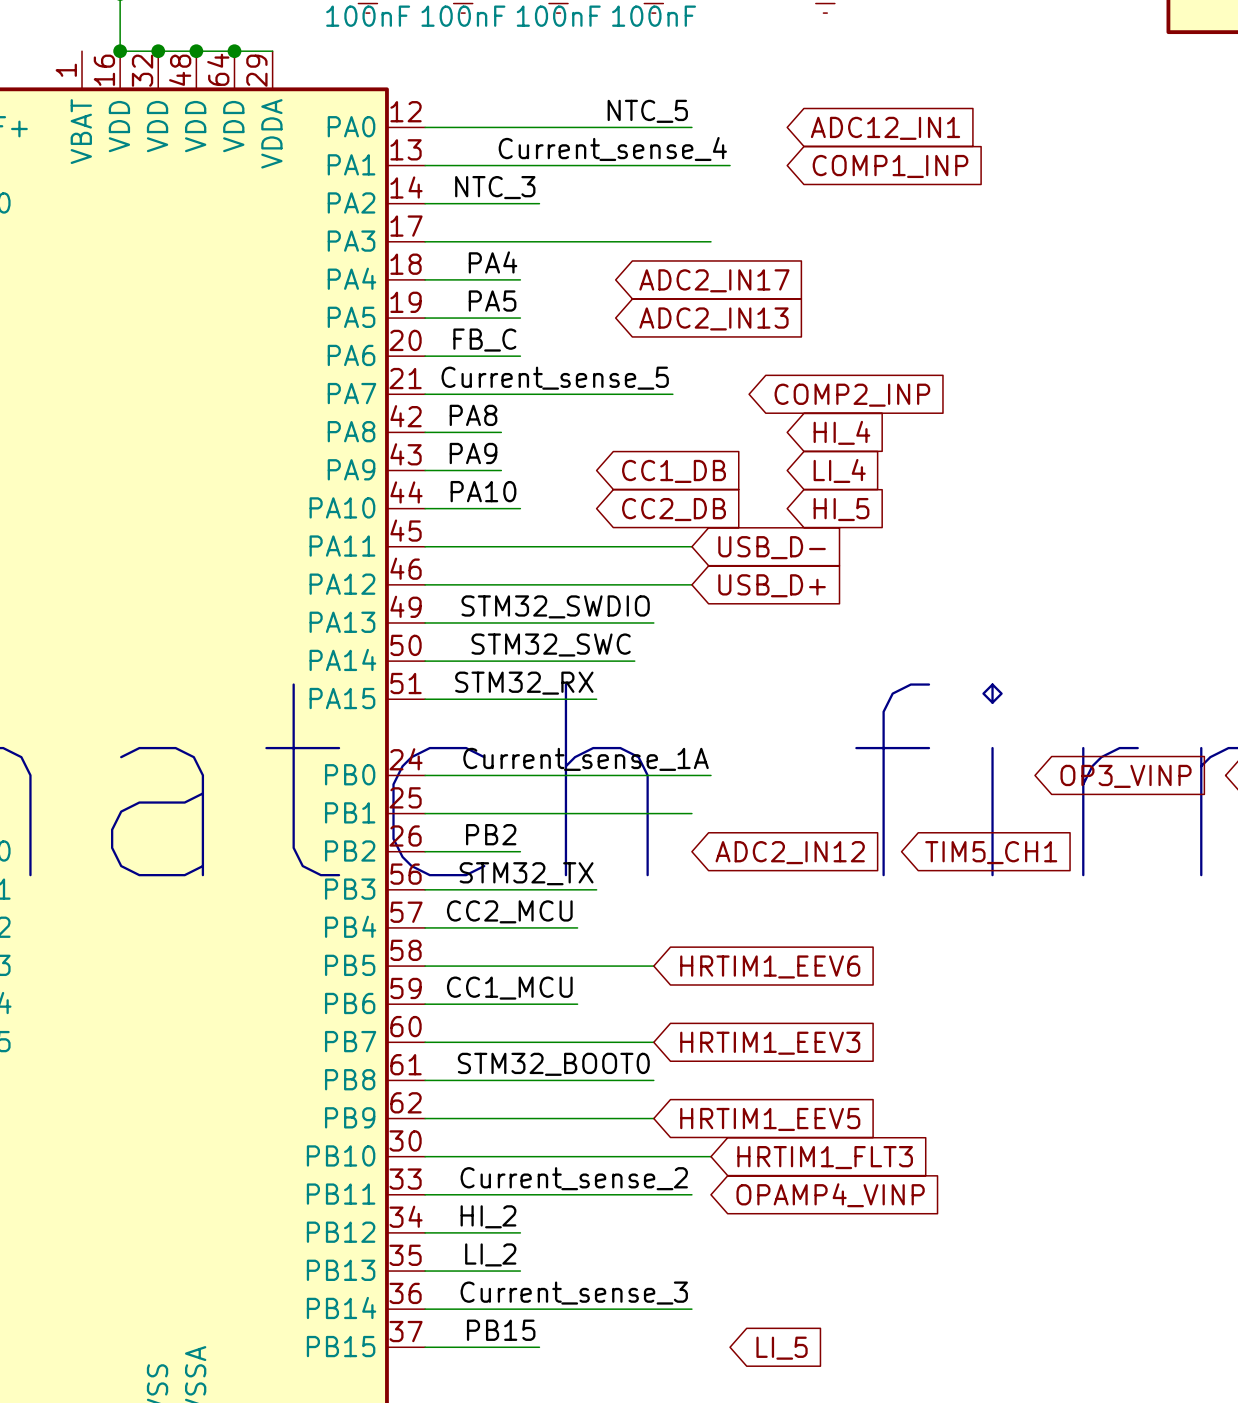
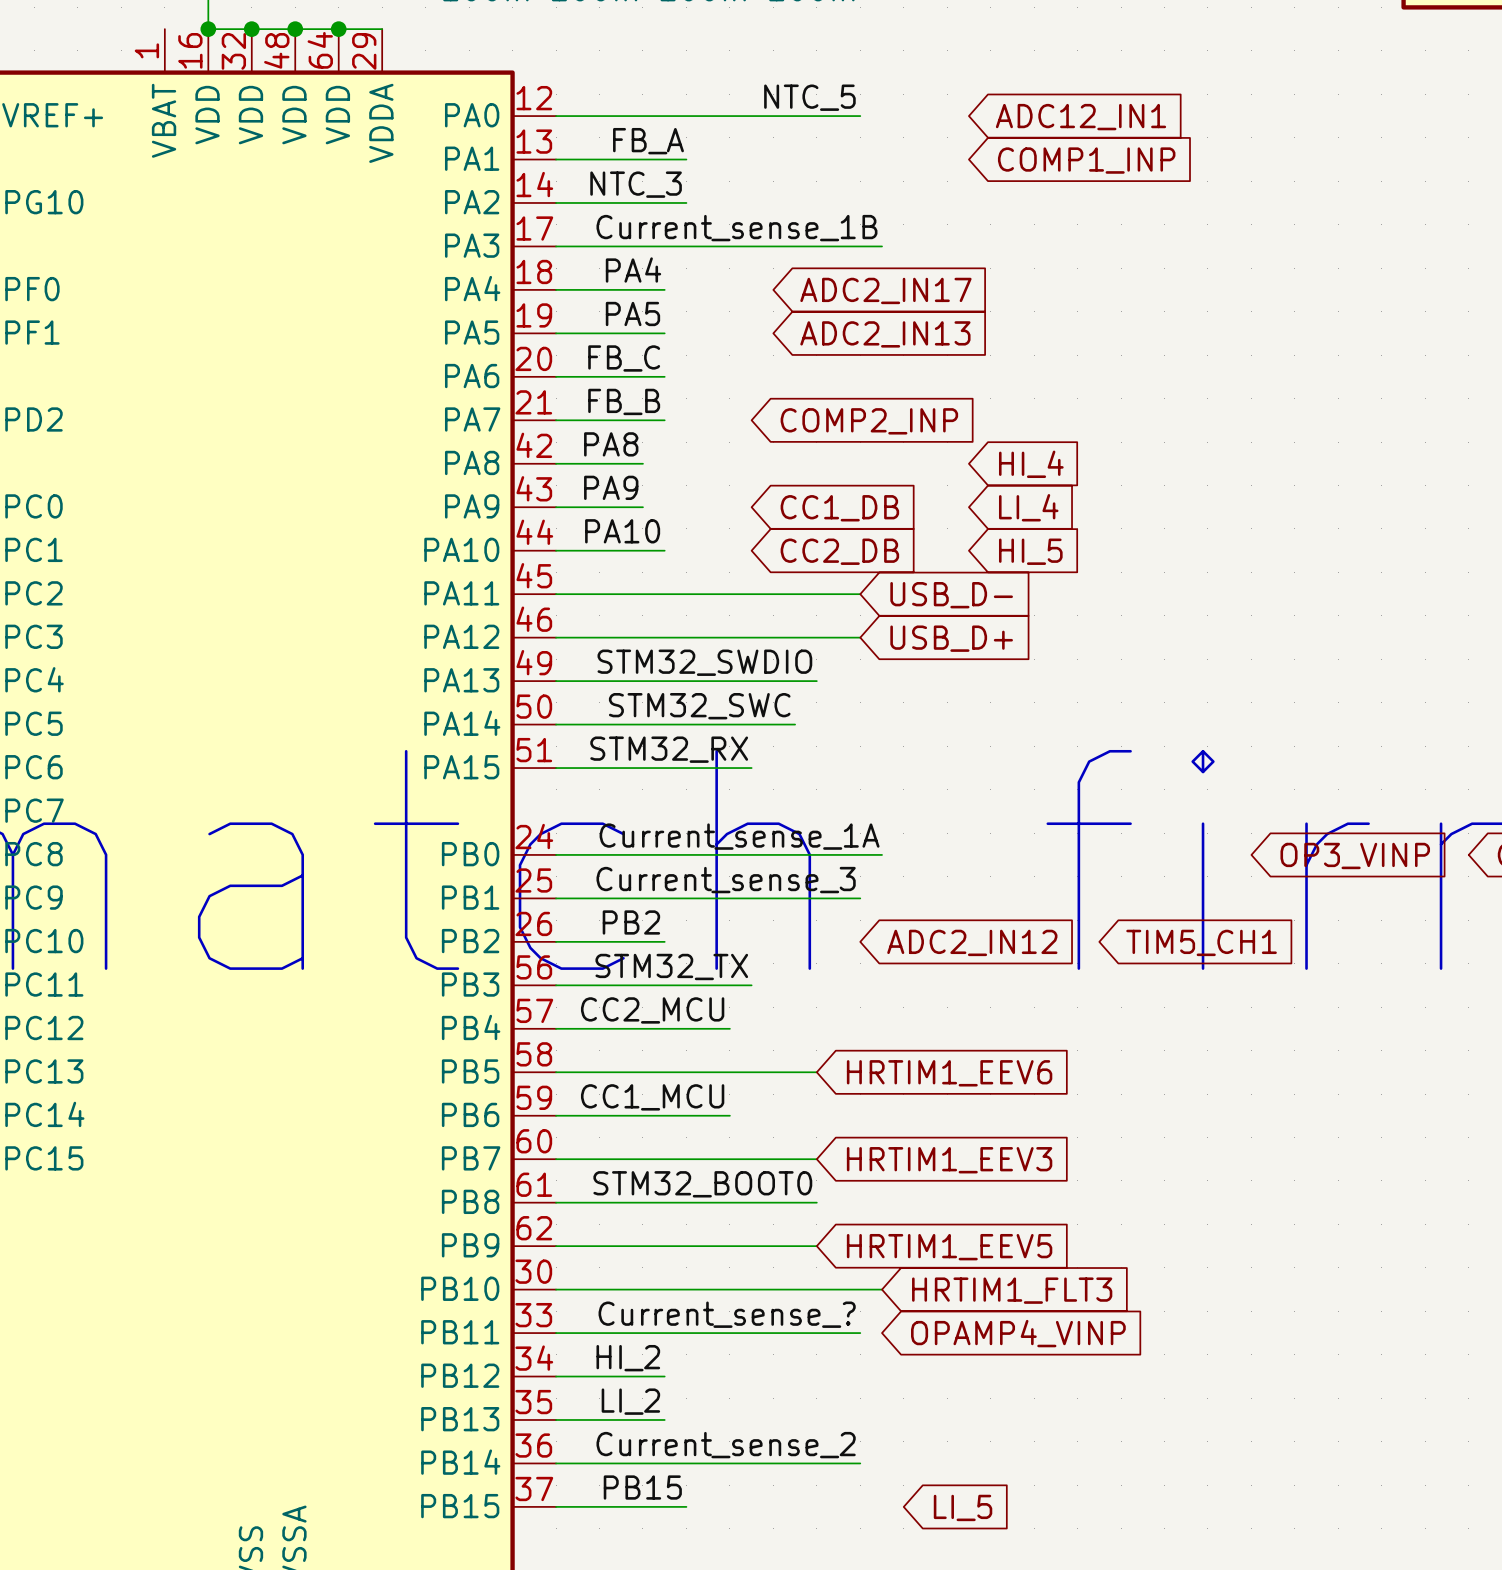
label: none -> FB_A (648, 141)
label: Current_sense_4 (612, 149) -> none
wire: (539, 165) (730, 165) -> none
label: none -> Current_sense_1B (736, 228)
label: none -> FB_B (624, 401)
label: Current_sense_5 (555, 378) -> none
wire: (520, 394) (672, 394) -> none
global label position: COMP2_INP (852, 395) -> COMP2_INP (869, 421)
label: none -> Current_sense_3 (726, 880)
label: Current_sense_2 (574, 1178) -> Current_sense_? (727, 1314)
label: Current_sense_3 (574, 1293) -> Current_sense_2 (726, 1445)

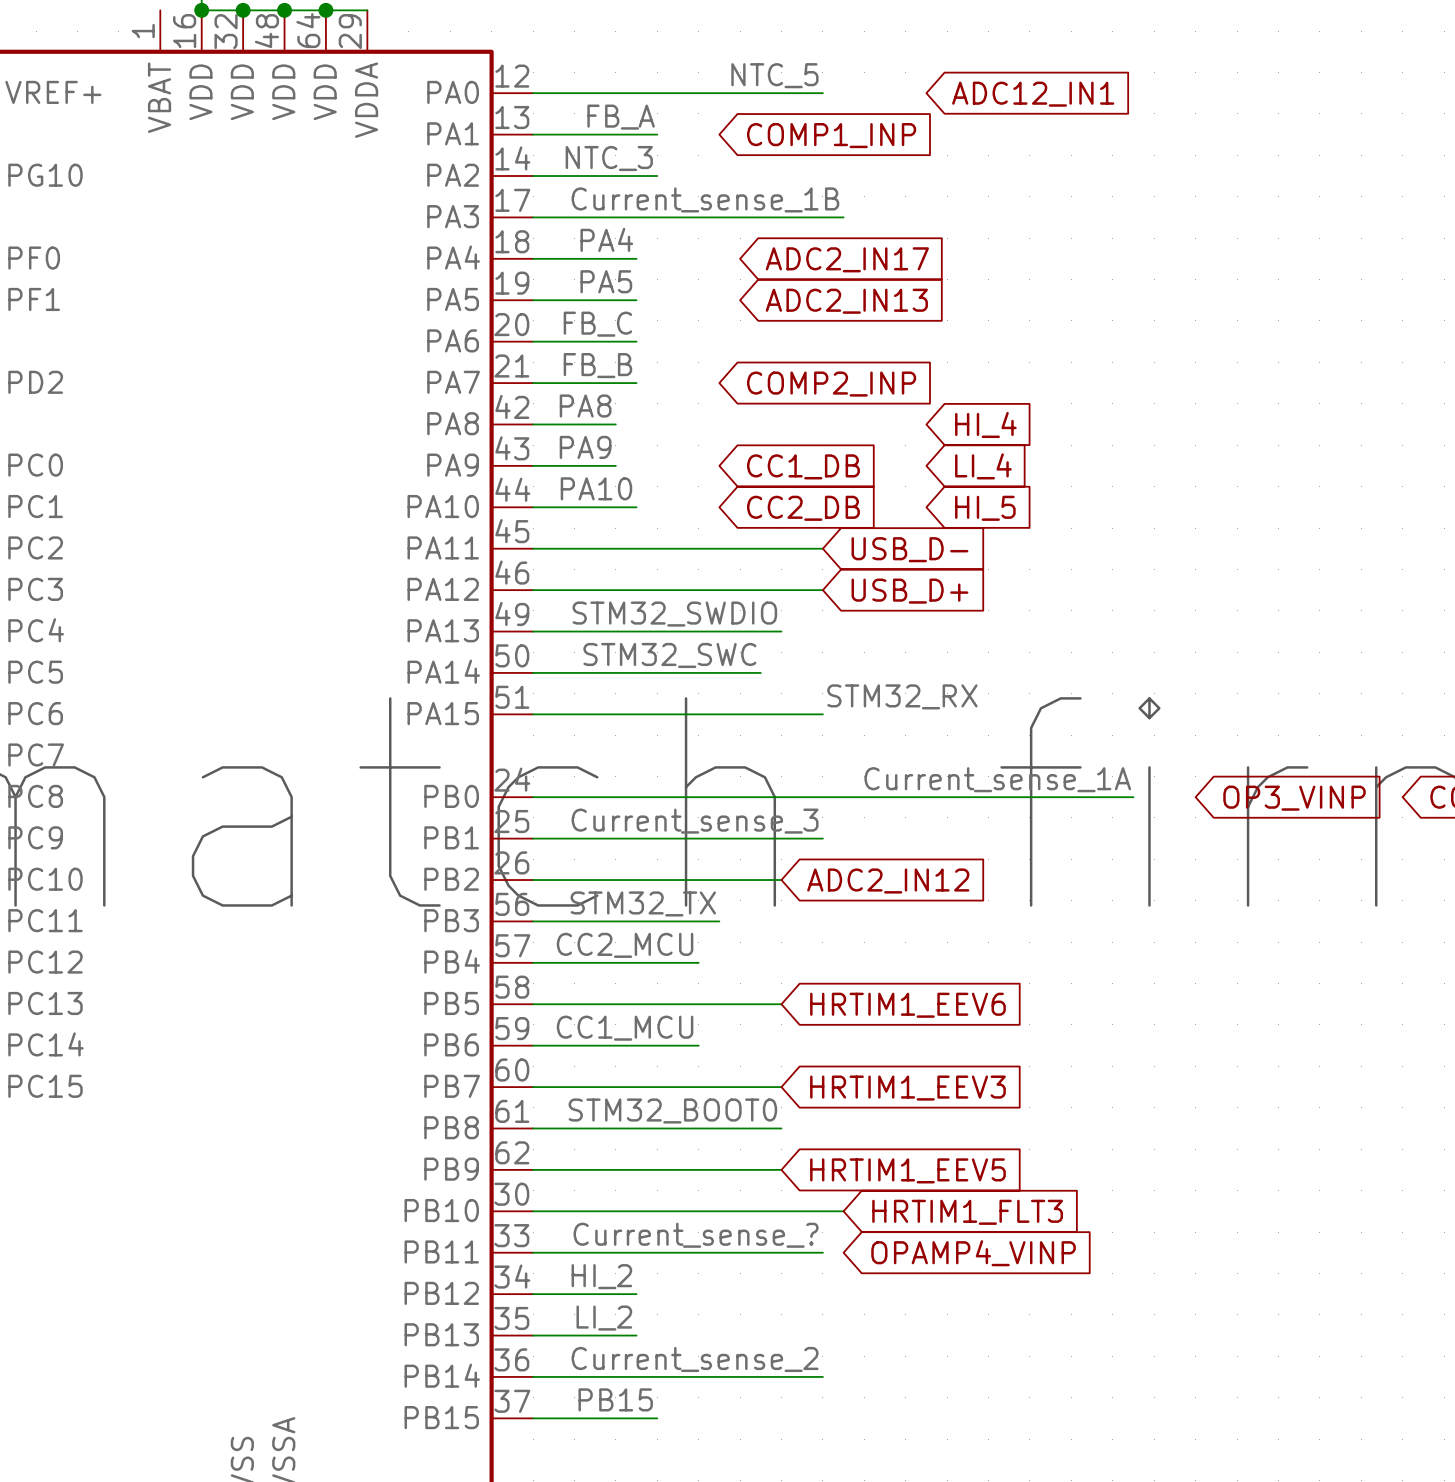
global label position: COMP1_INP (1086, 160) -> COMP1_INP (831, 135)
label position: STM32_RX (669, 749) -> STM32_RX (902, 696)
wire: none -> (719, 714) (822, 714)
label position: Current_sense_1A (739, 836) -> Current_sense_1A (997, 779)
wire: none -> (843, 797) (1133, 797)
label: PB2 (631, 922) -> none
wire: none -> (636, 880) (781, 880)
global label position: ADC2_IN12 (972, 942) -> ADC2_IN12 (888, 881)
global label: TIM5_CH1 (1201, 942) -> none
global label: LI_5 (963, 1507) -> none

